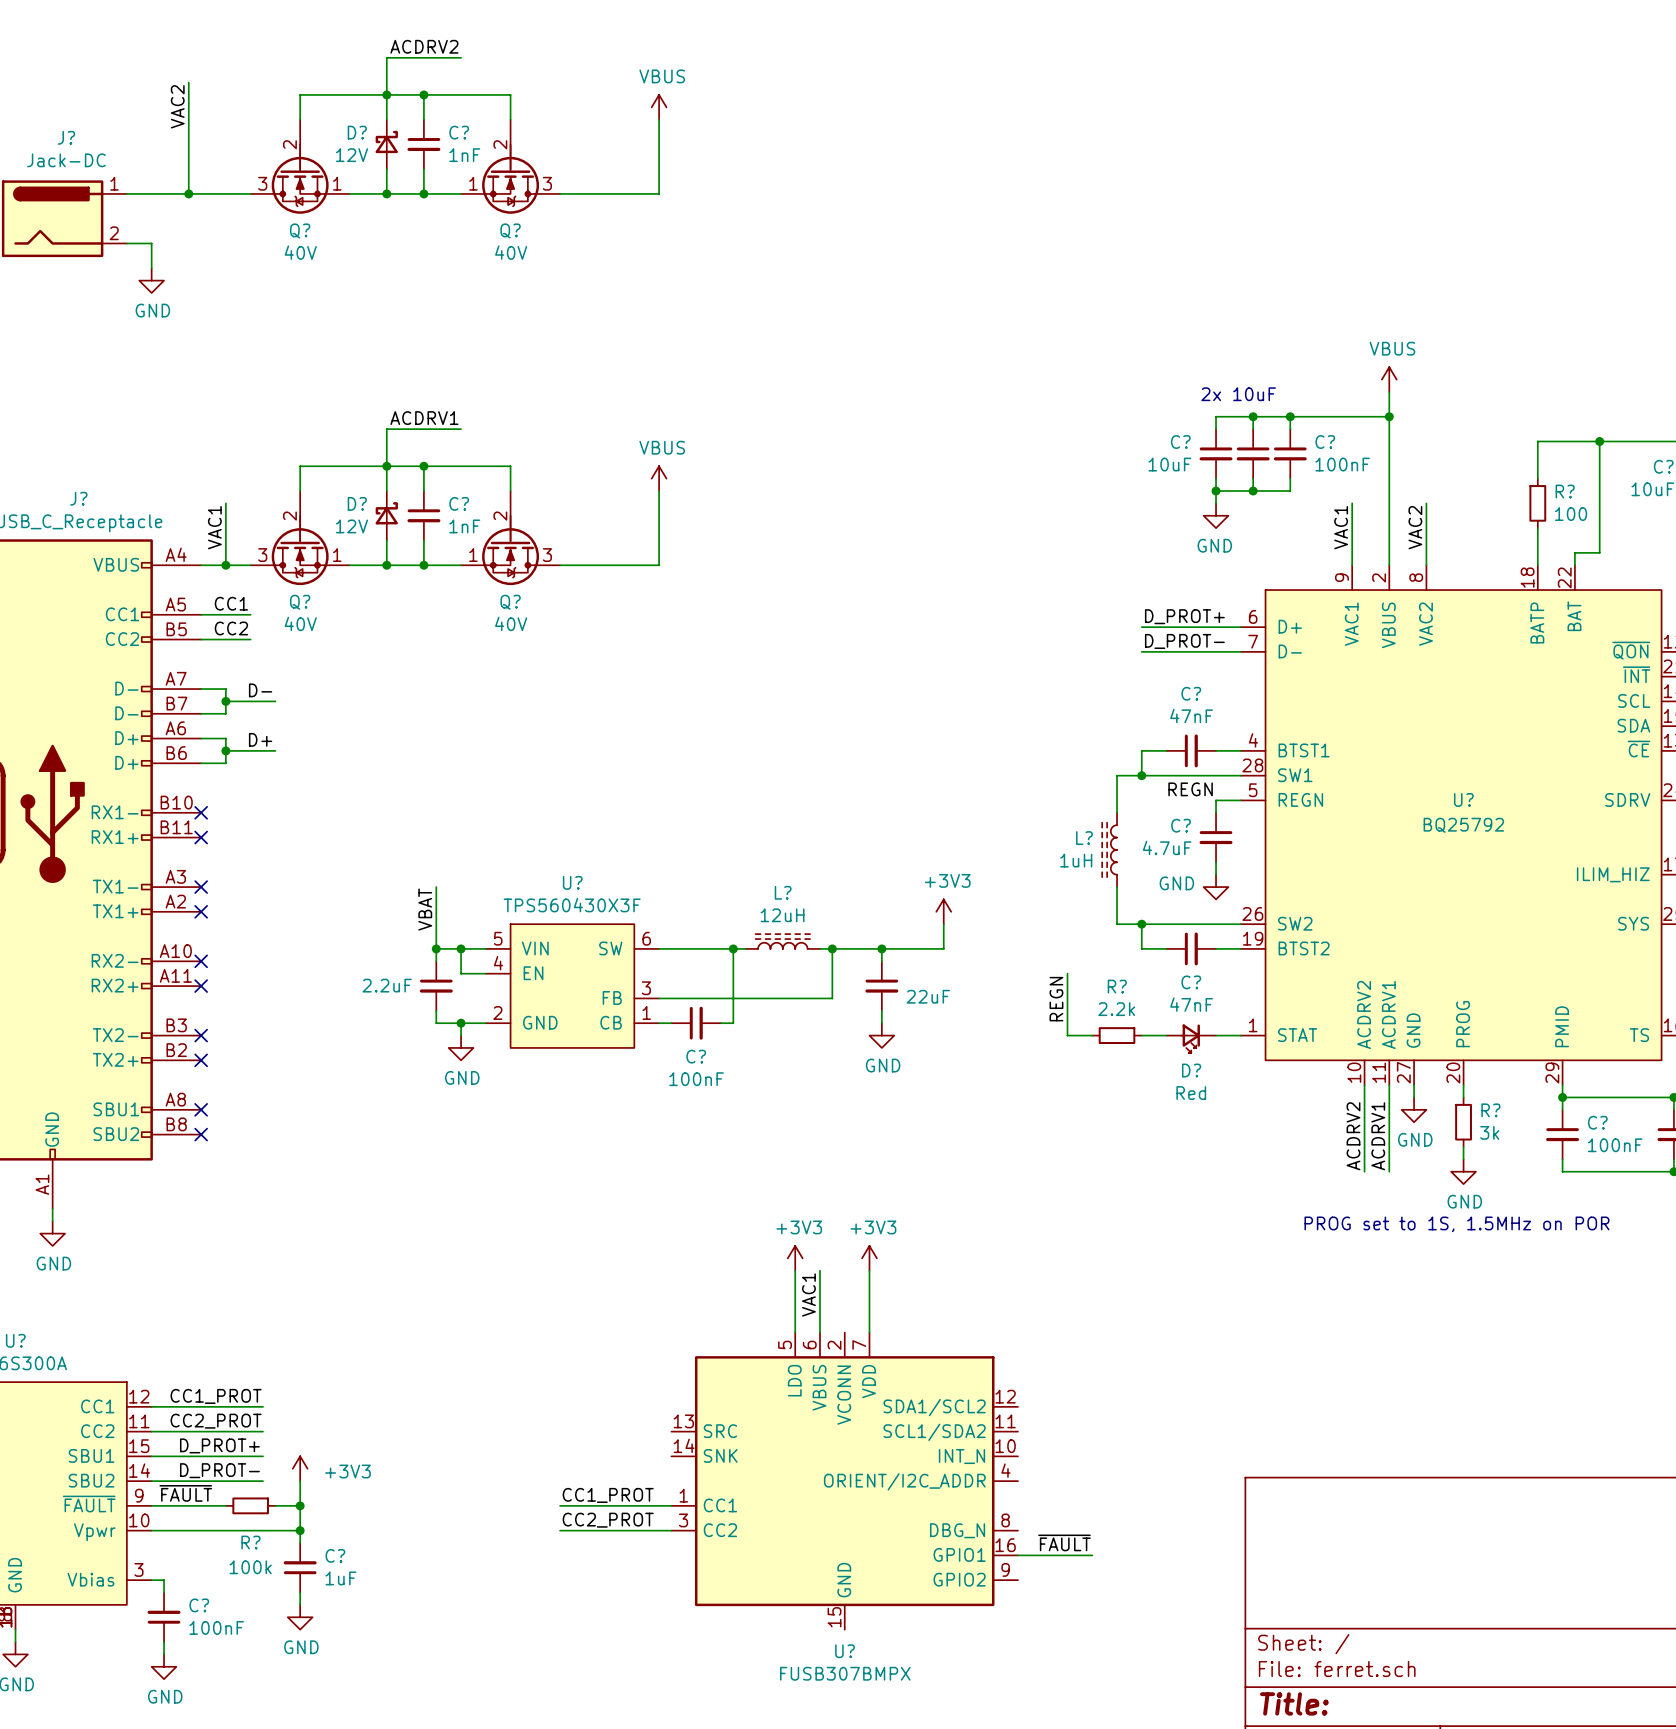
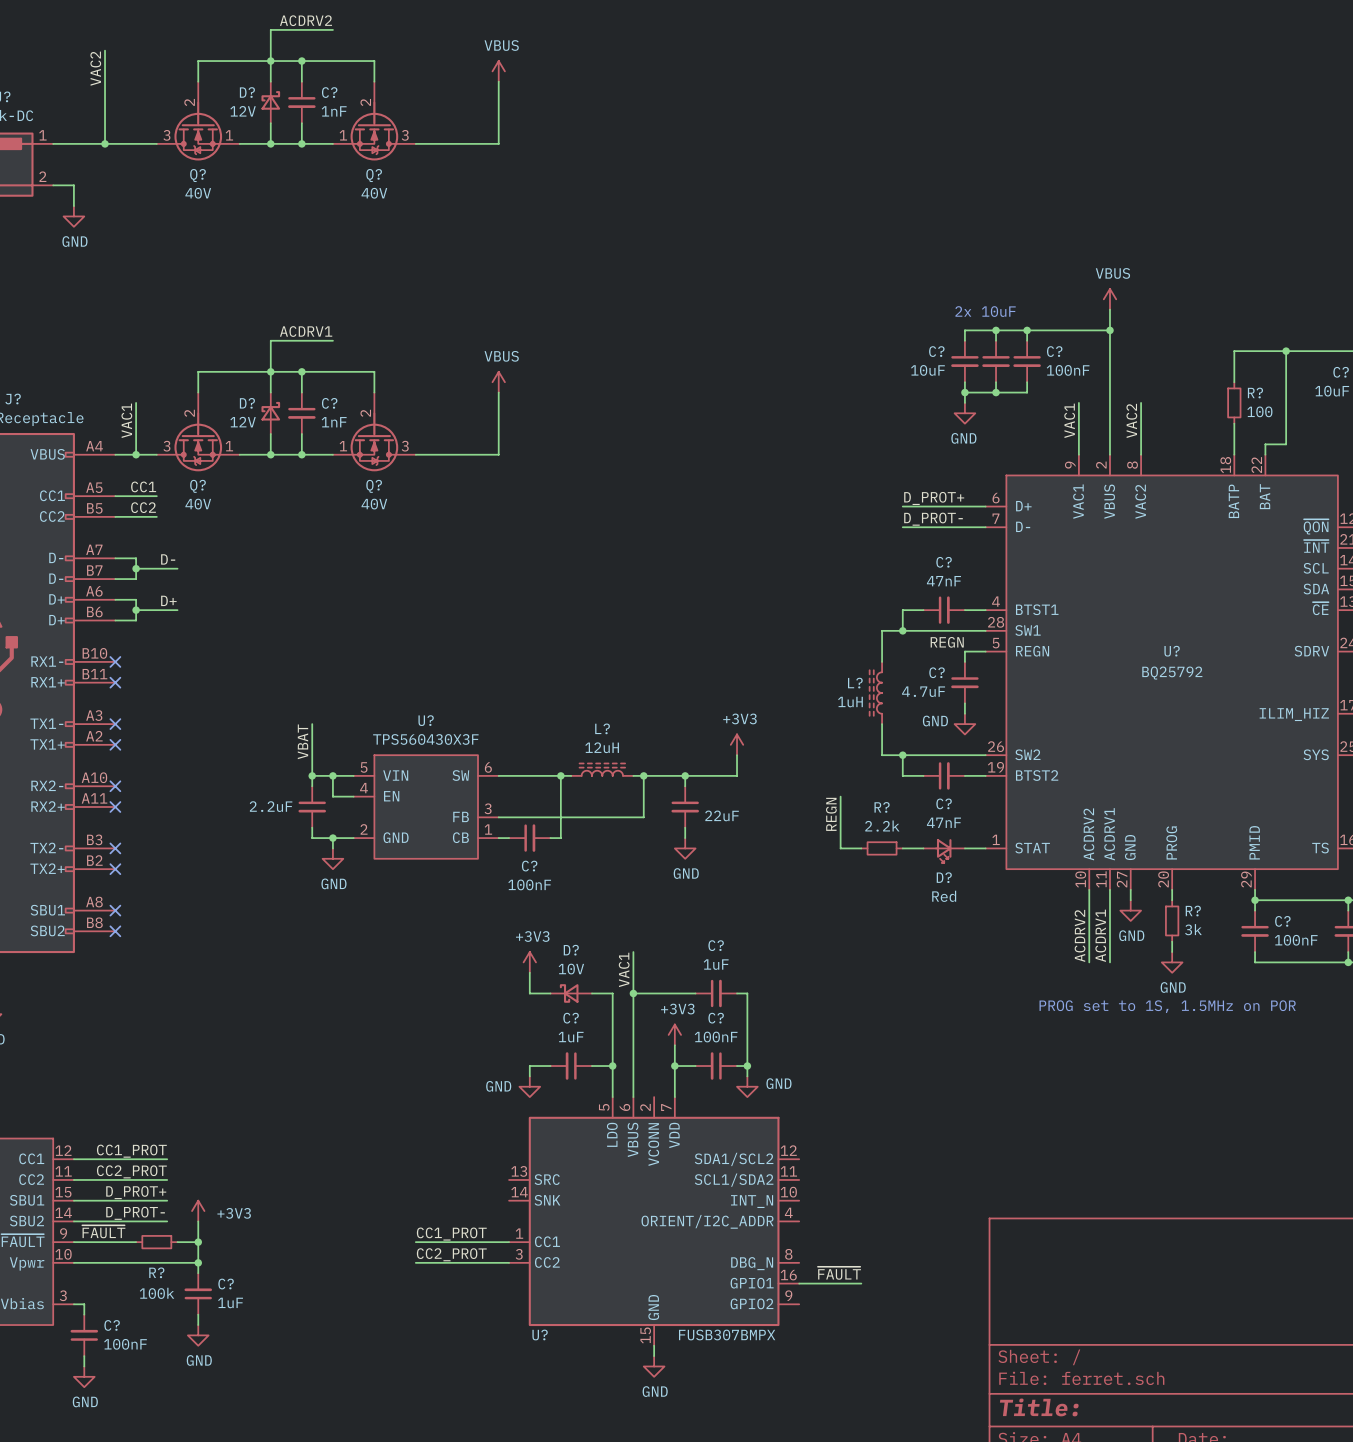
wire: none -> (633, 952) (633, 1045)
wire: none -> (529, 972) (529, 993) (550, 993)
D?: none -> 10V (571, 993)
wire: none -> (591, 993) (612, 993) (612, 1045)
wire: none -> (633, 993) (695, 993)
junction: none -> (633, 993)
C?: none -> 1uF (716, 993)
wire: none -> (737, 993) (747, 993) (747, 1076)
power symbol position: +3V3 (795, 1258) -> +3V3 (529, 962)
label position: VAC1 (808, 1294) -> VAC1 (624, 969)
wire: none -> (550, 1066) (529, 1066) (529, 1076)
C?: none -> 1uF (571, 1066)
wire: none -> (591, 1066) (612, 1066)
junction: none -> (612, 1066)
wire: none -> (674, 1066) (695, 1066)
junction: none -> (674, 1066)
C?: none -> 100nF (716, 1066)
wire: none -> (737, 1066) (747, 1066)
junction: none -> (747, 1066)
power symbol: none -> GND (529, 1086)
power symbol: none -> GND (747, 1086)
wire: none -> (654, 1345) (654, 1356)
U? name position: U? (845, 1651) -> U? (540, 1335)
power symbol: none -> GND (654, 1366)
U? value position: FUSB307BMPX (845, 1673) -> FUSB307BMPX (727, 1335)

